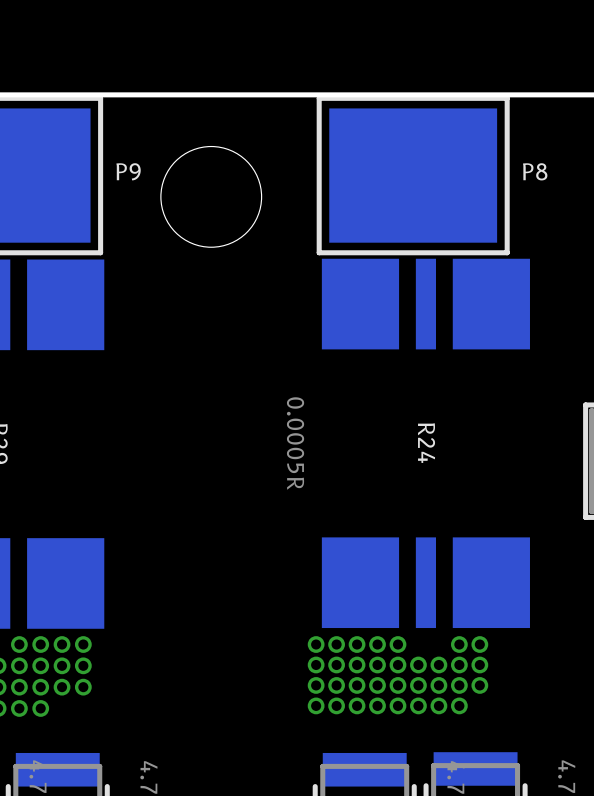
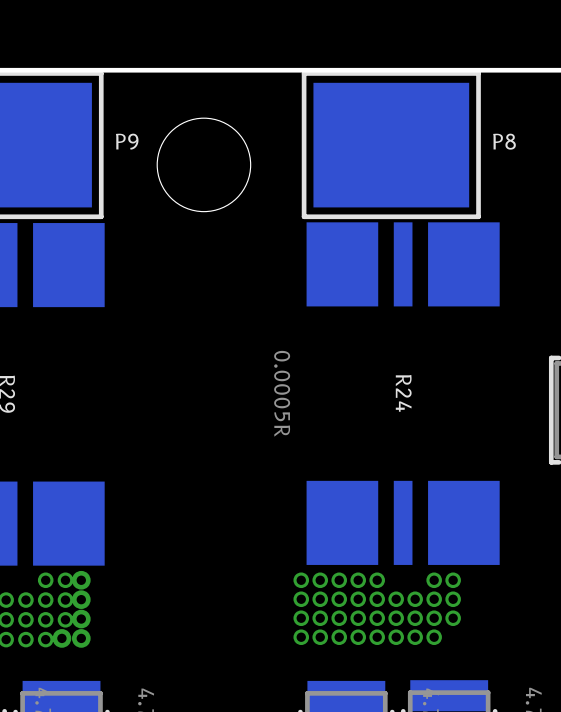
part footprint: [74, 636, 92, 653] -> [71, 570, 91, 590]
part: (19, 644) -> none
part footprint: [74, 657, 92, 675] -> [71, 590, 91, 609]
part footprint: [74, 678, 92, 696] -> [71, 609, 91, 629]
part: none -> (61, 638)
part: none -> (81, 638)

